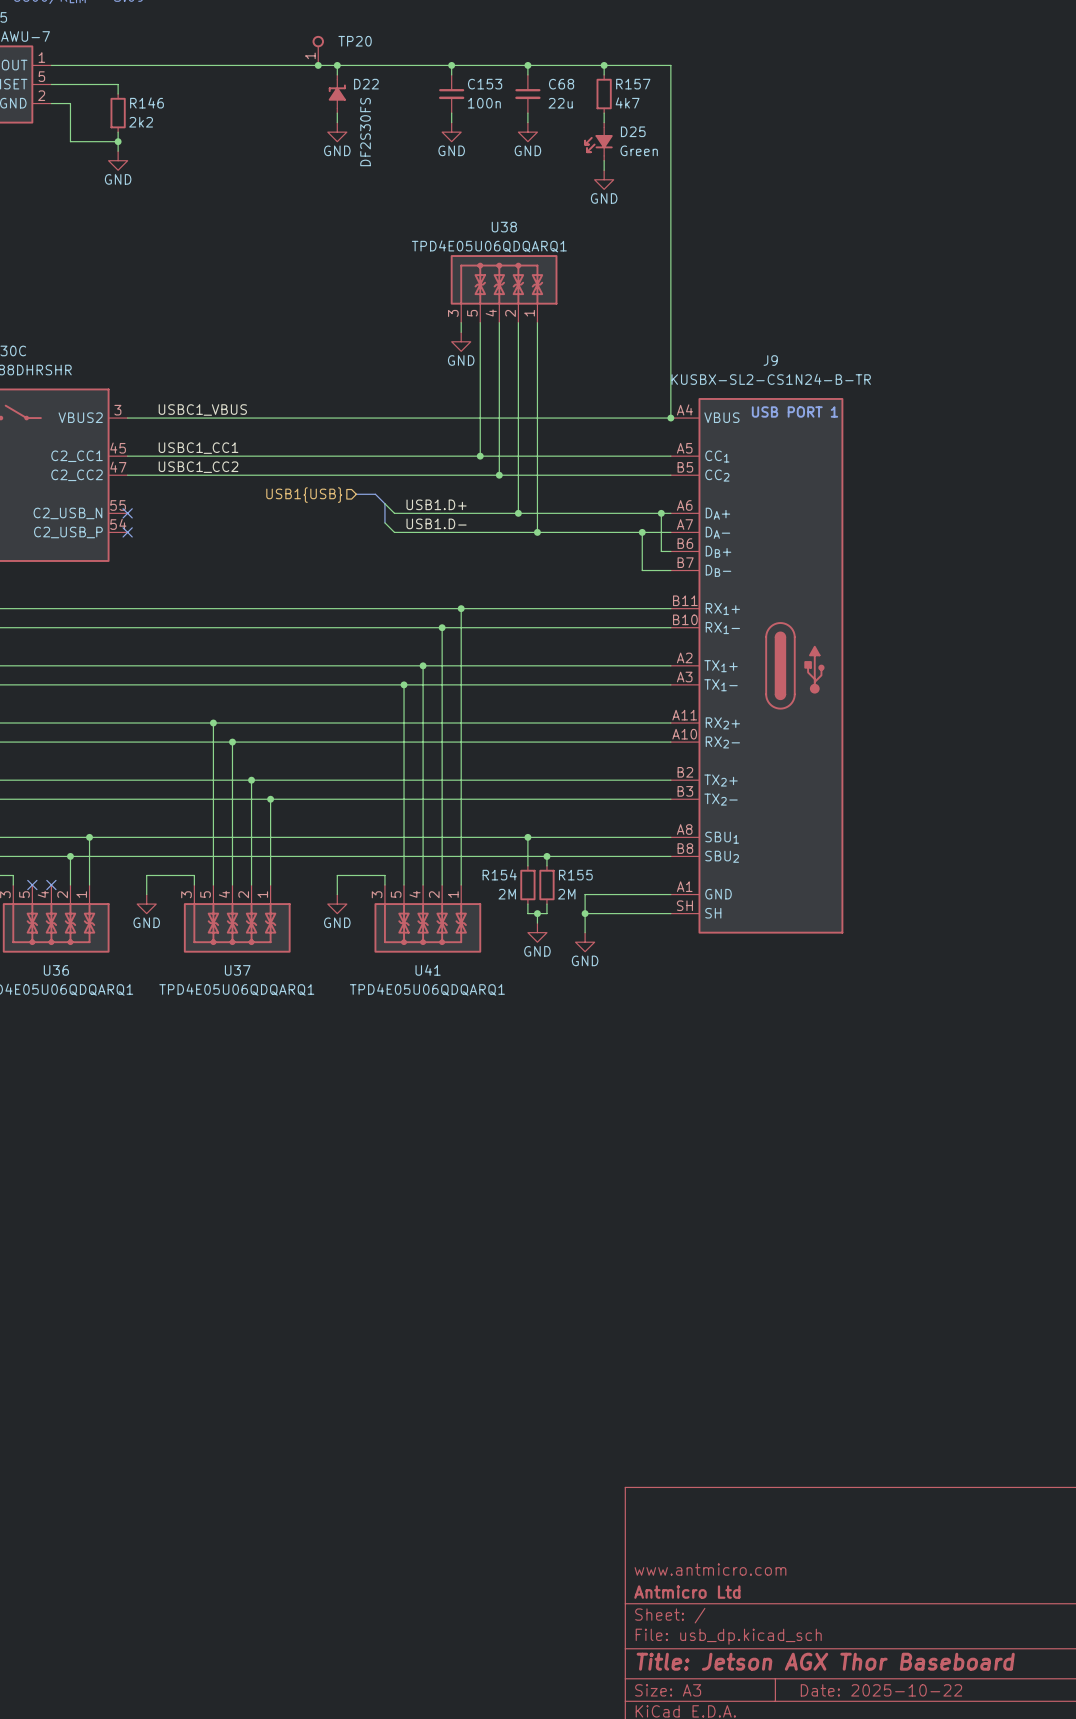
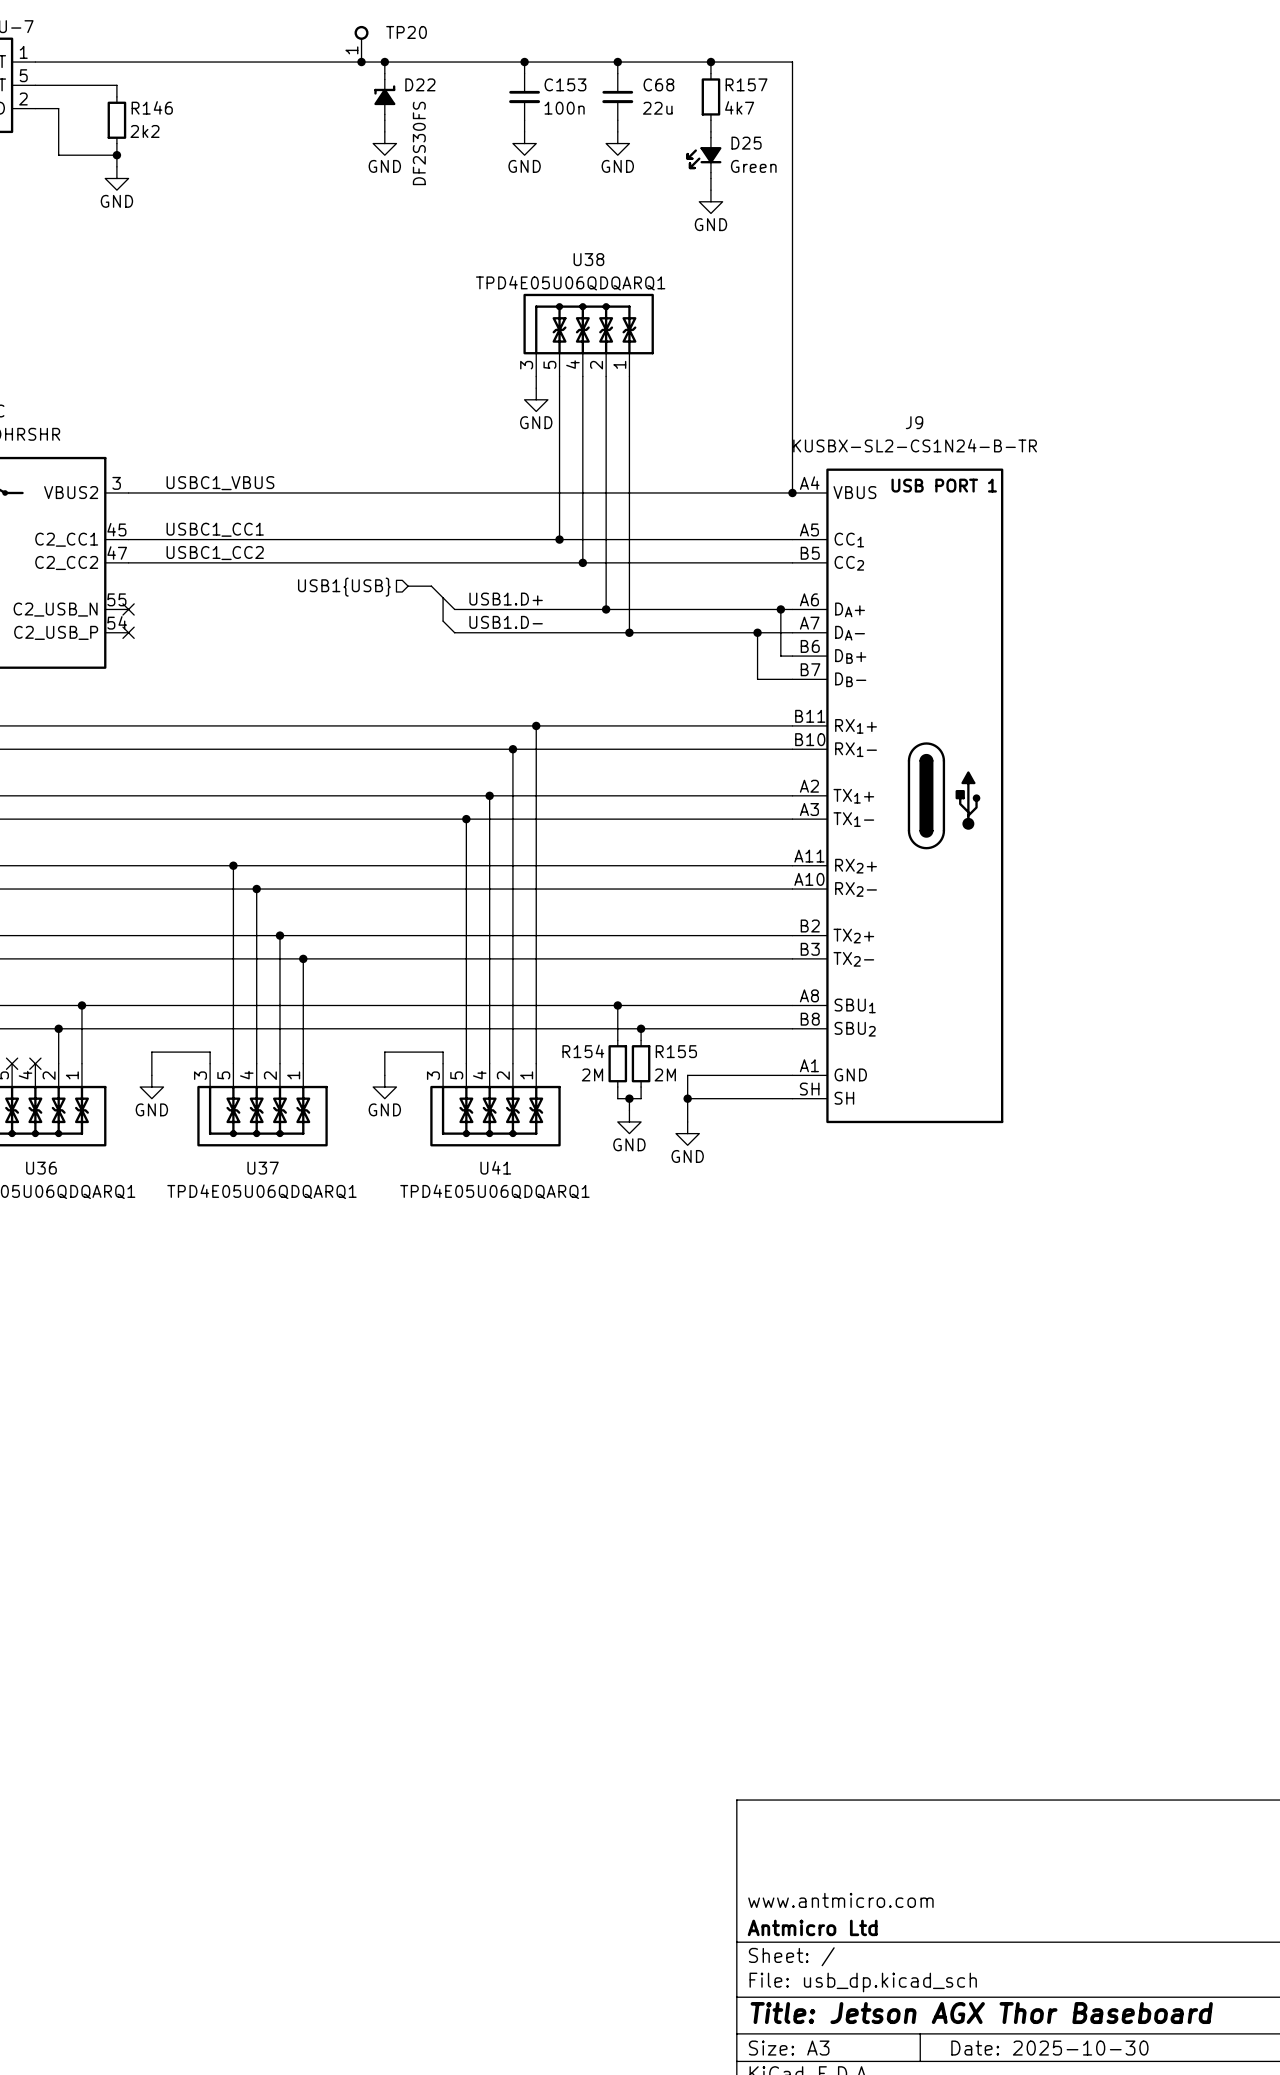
title block: Date: 2025-10-22 (881, 1690) -> Date: 2025-10-30 (1049, 2048)

